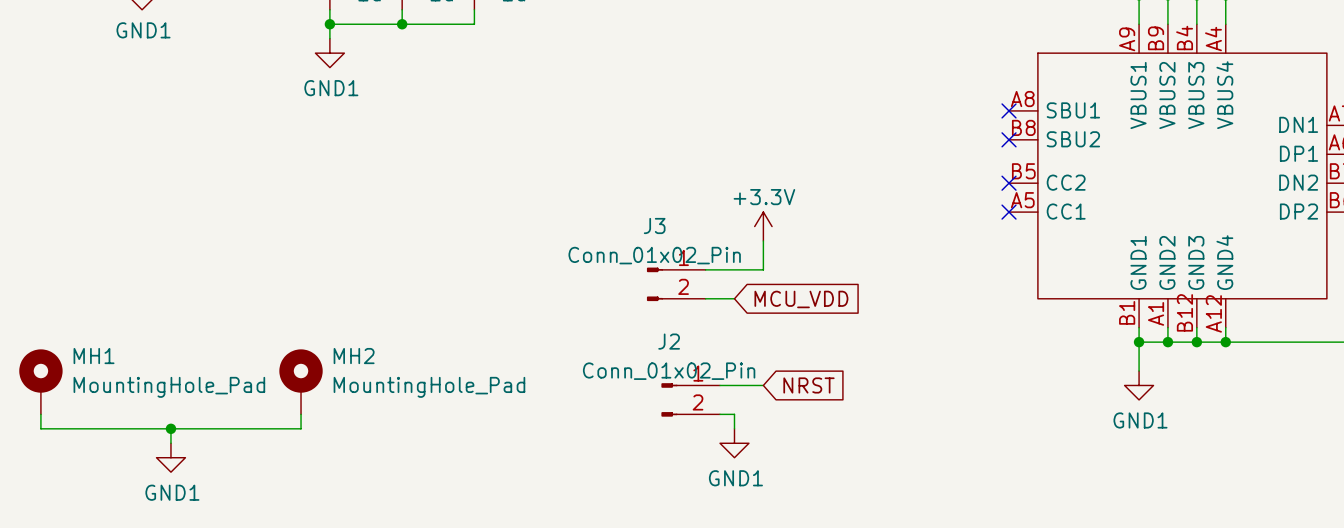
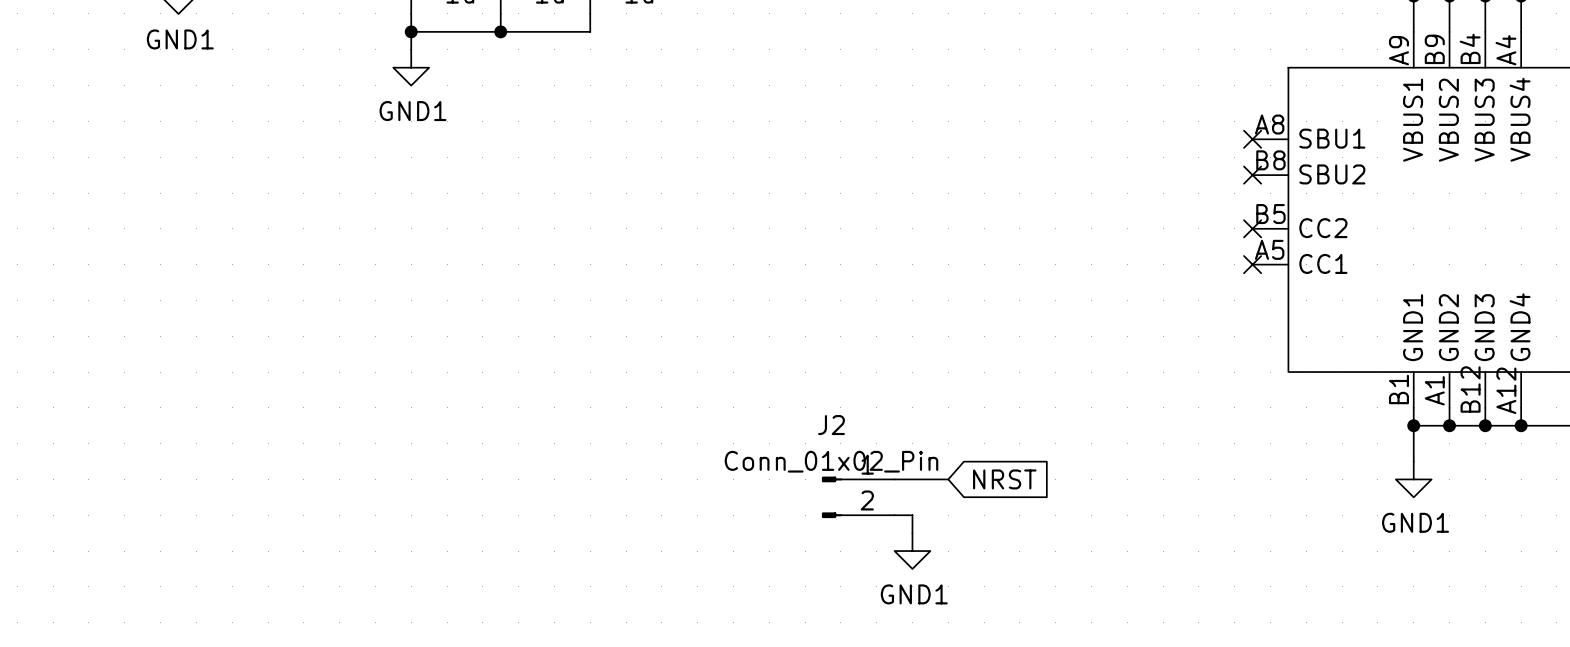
power symbol: +3.3V (763, 226) -> none
wire: (763, 240) (763, 269) (705, 269) -> none
J3: Conn_01x02_Pin (676, 284) -> none
wire: (705, 298) (734, 298) -> none
global label: MCU_VDD (801, 299) -> none
MH1: MountingHole_Pad (40, 381) -> none
MH2: MountingHole_Pad (301, 381) -> none
wire: (40, 414) (40, 428) (301, 428) (301, 414) -> none
wire: (170, 428) (170, 443) -> none
junction: (170, 428) -> none
power symbol: GND1 (170, 457) -> none

